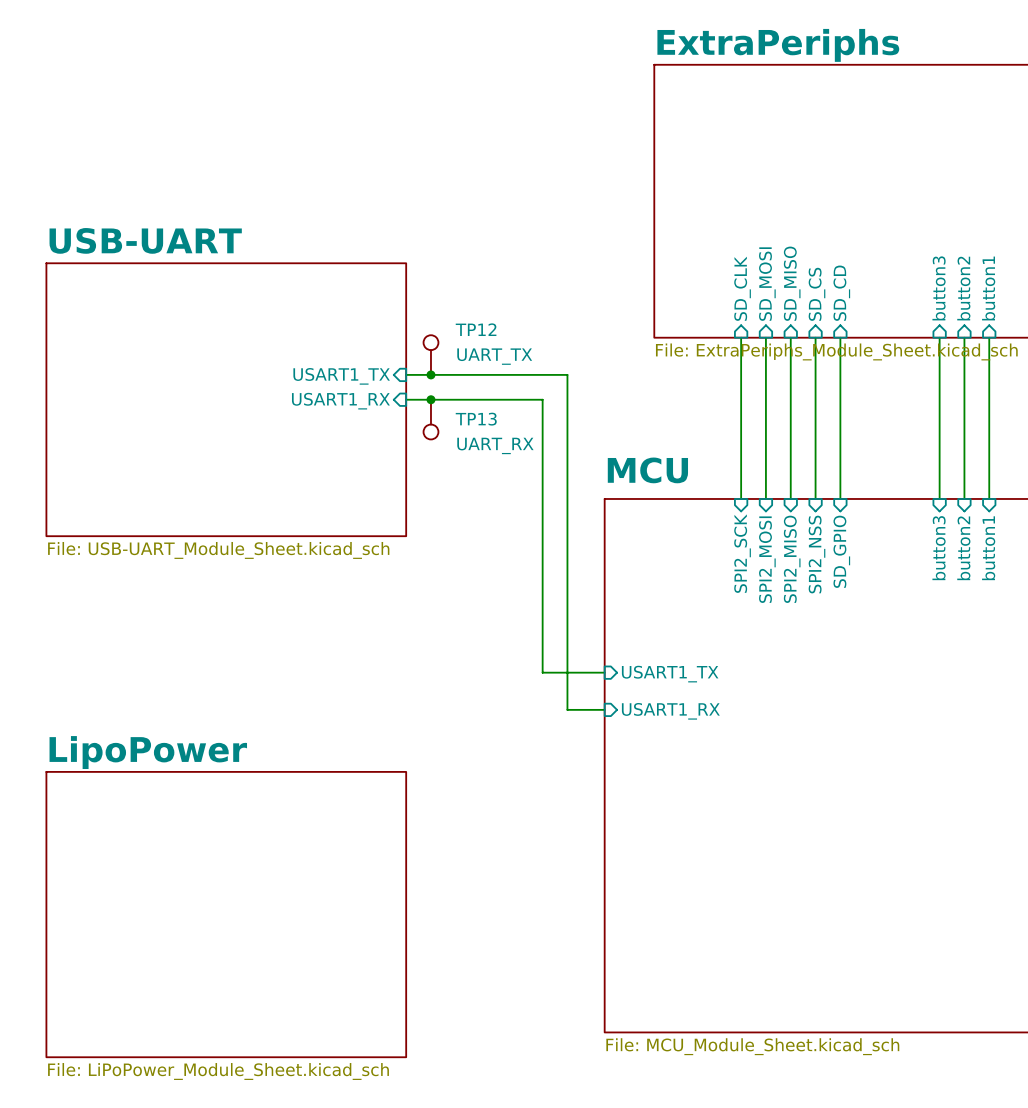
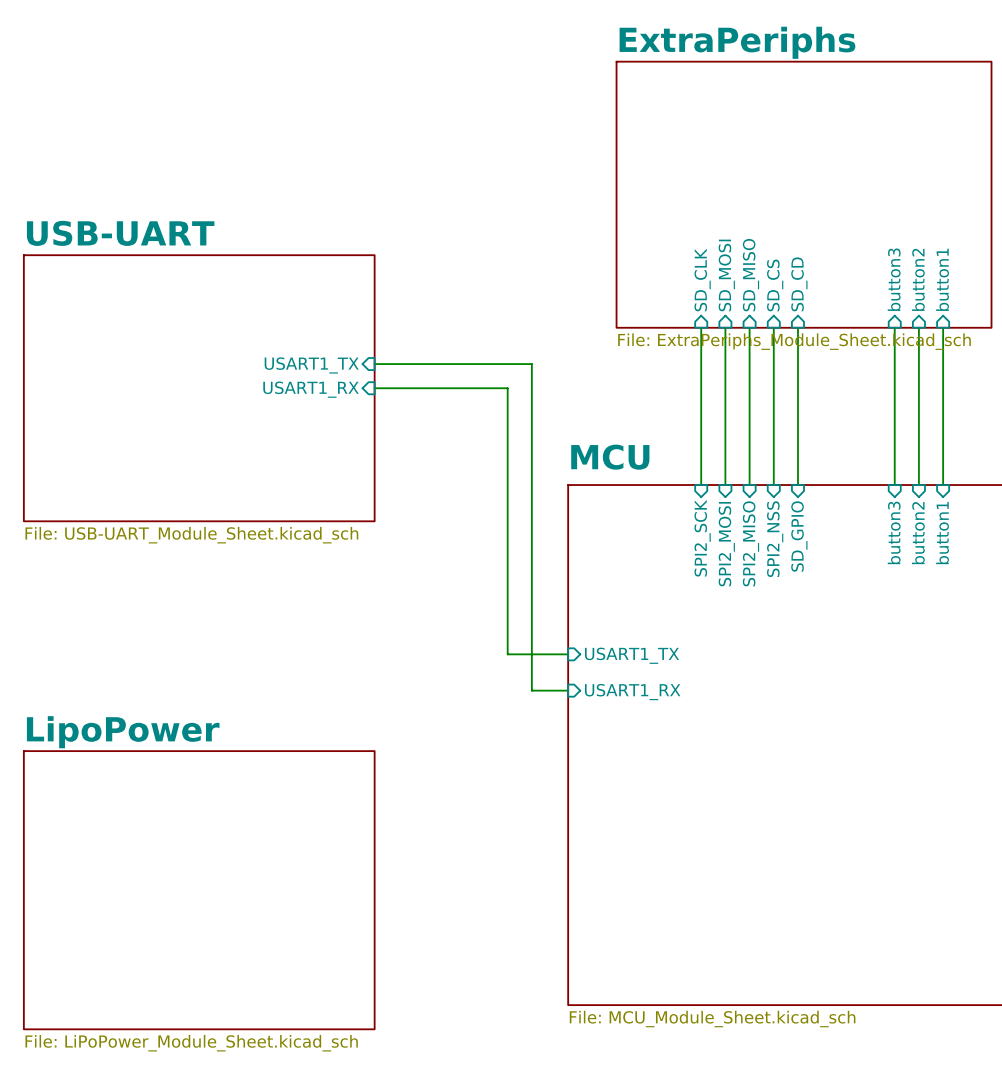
TP12: UART_TX (430, 355) -> none
junction: (430, 374) -> none
junction: (430, 399) -> none
TP13: UART_RX (430, 419) -> none

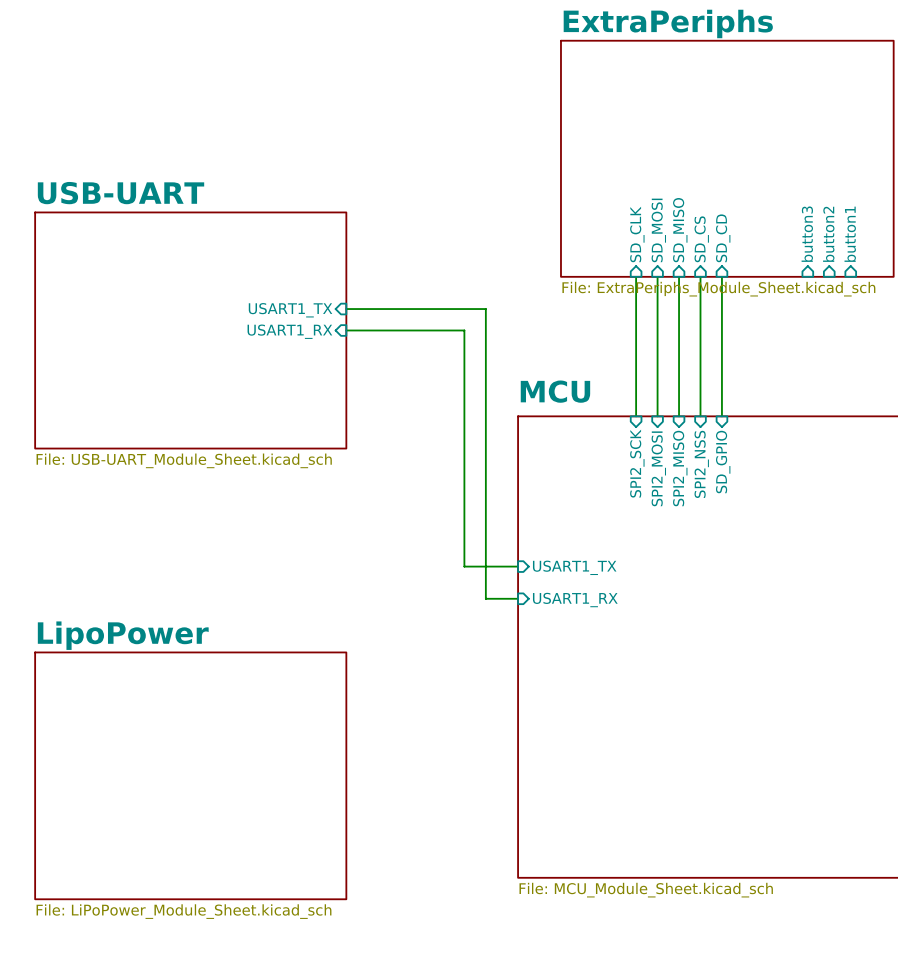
wire: (894, 327) (894, 485) -> none
wire: (918, 327) (918, 485) -> none
wire: (943, 327) (943, 485) -> none
sheet pin: button3 (894, 532) -> none
sheet pin: button2 (918, 533) -> none
sheet pin: button1 (942, 533) -> none

